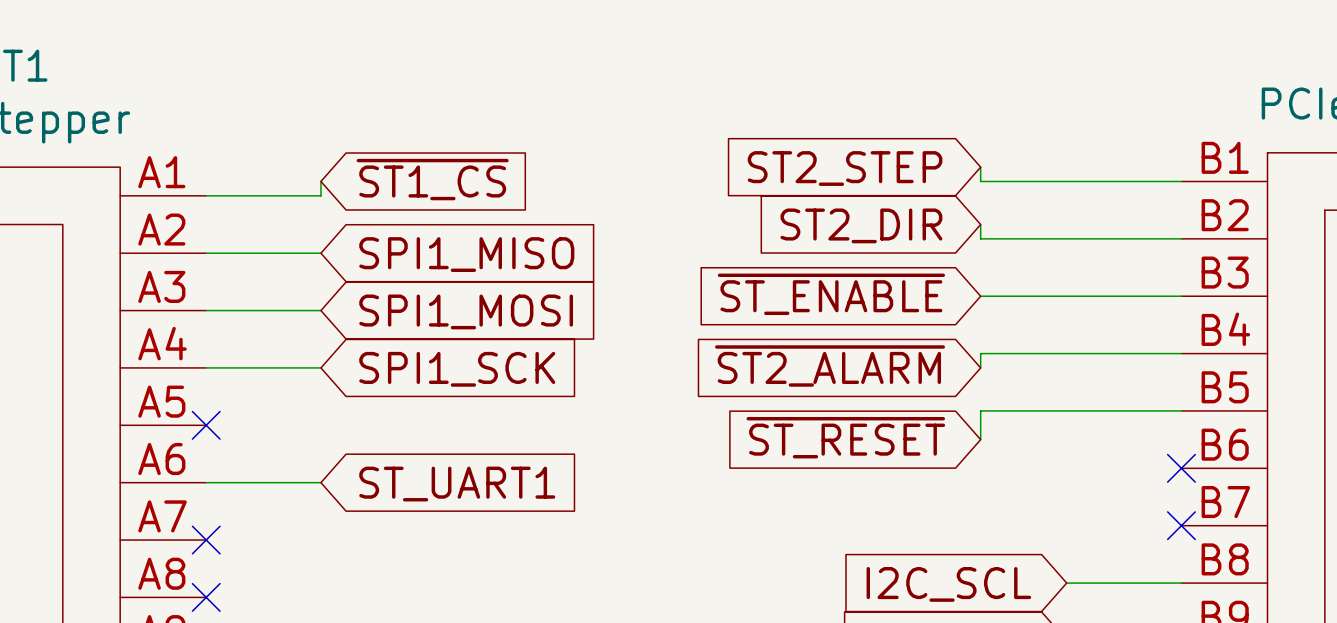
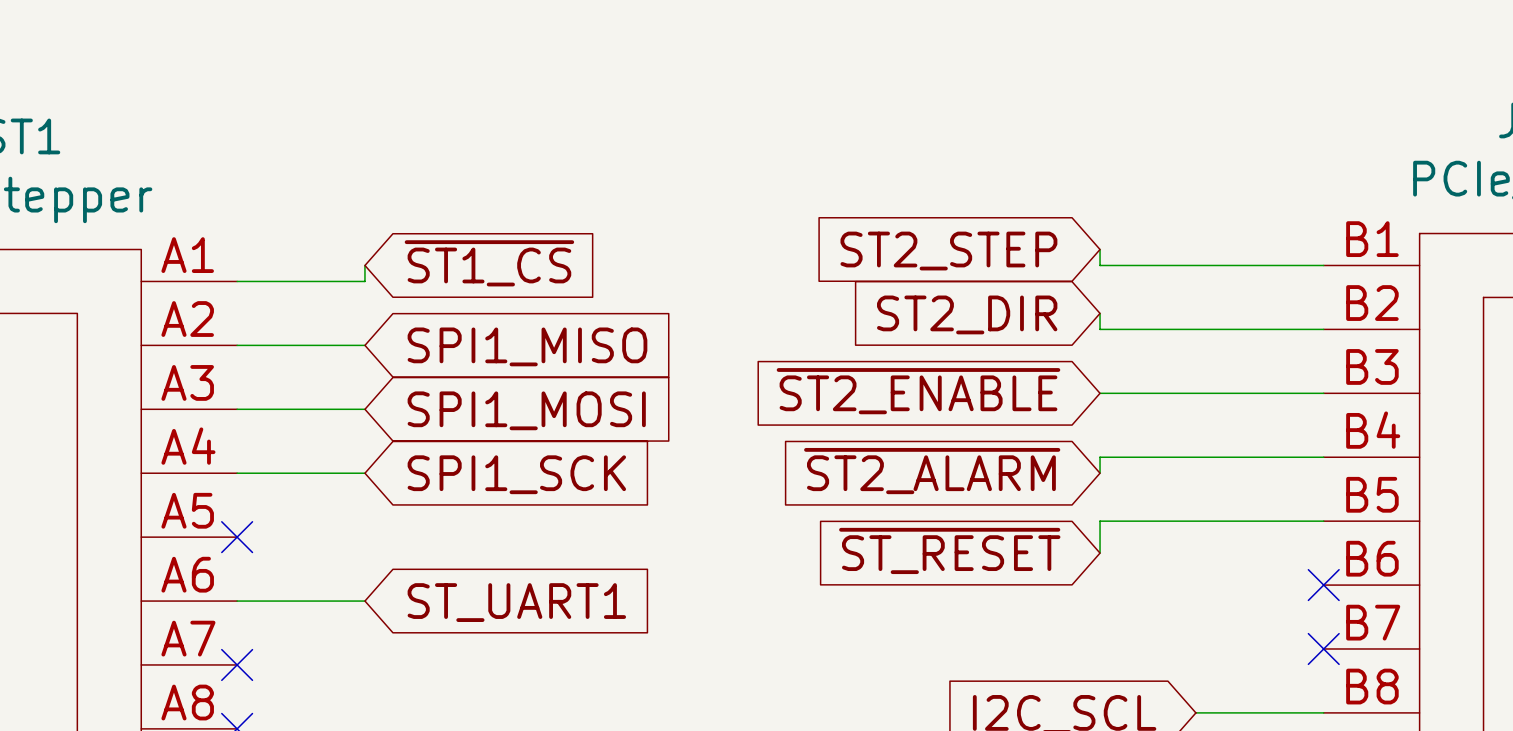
global label: ~{ST_ENABLE} (831, 294) -> ~{ST2_ENABLE} (918, 391)

